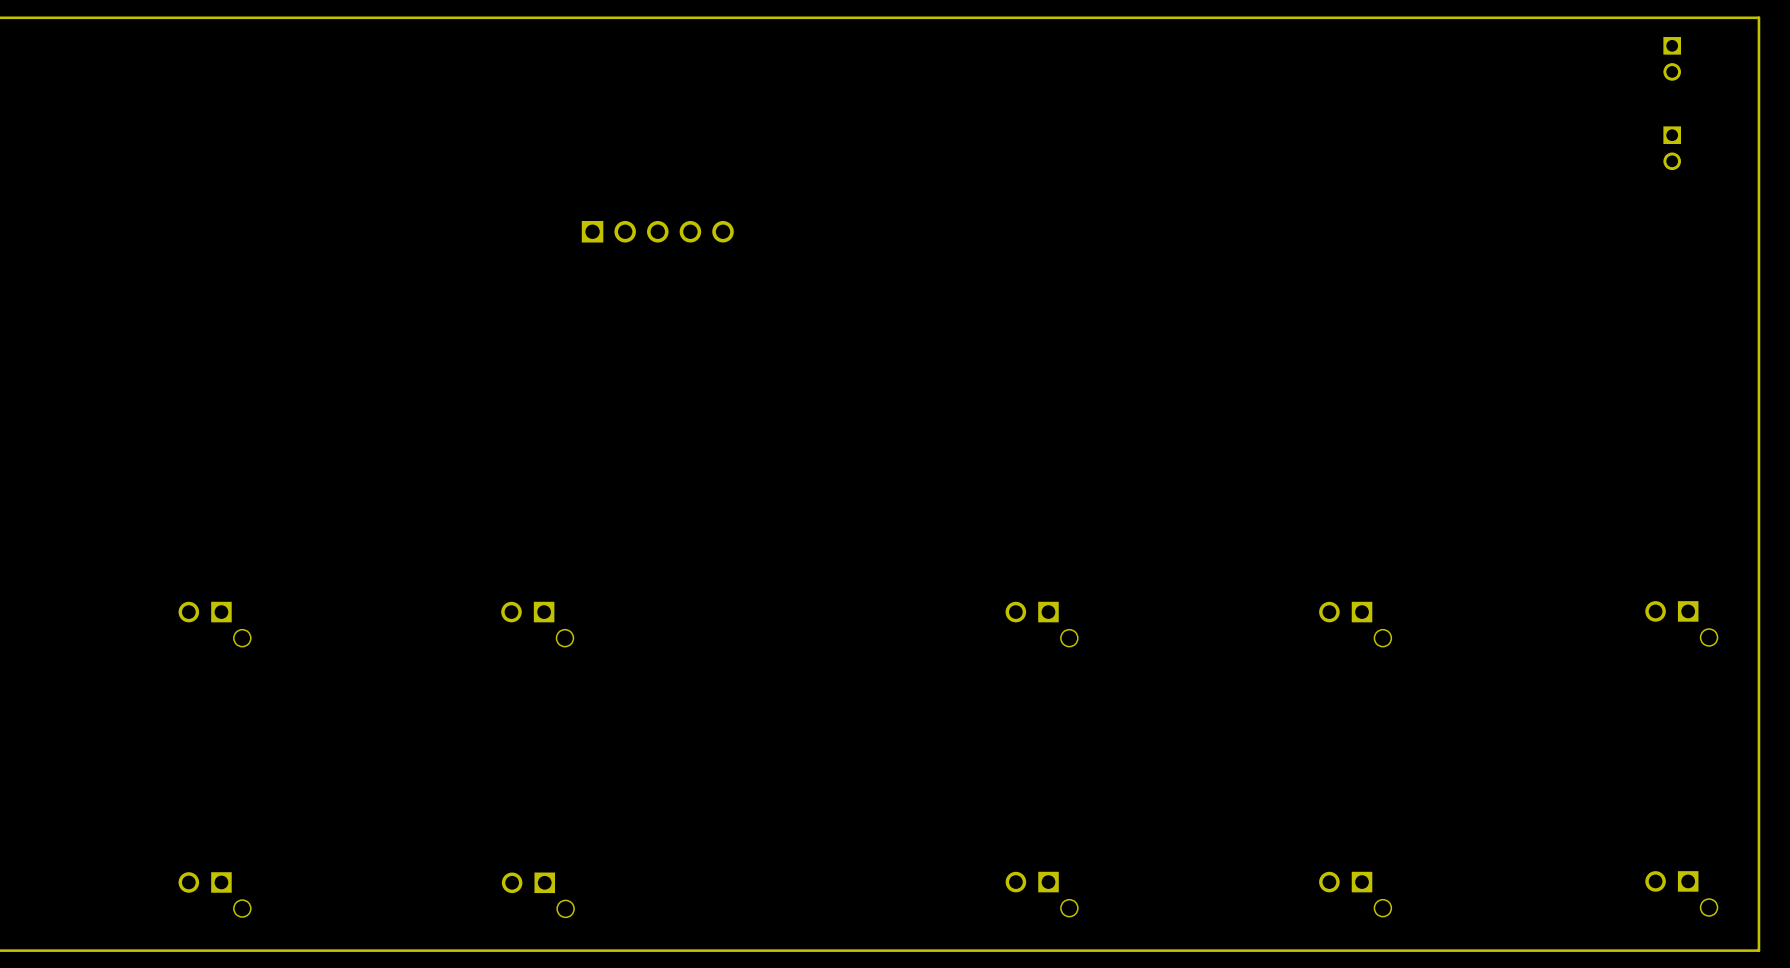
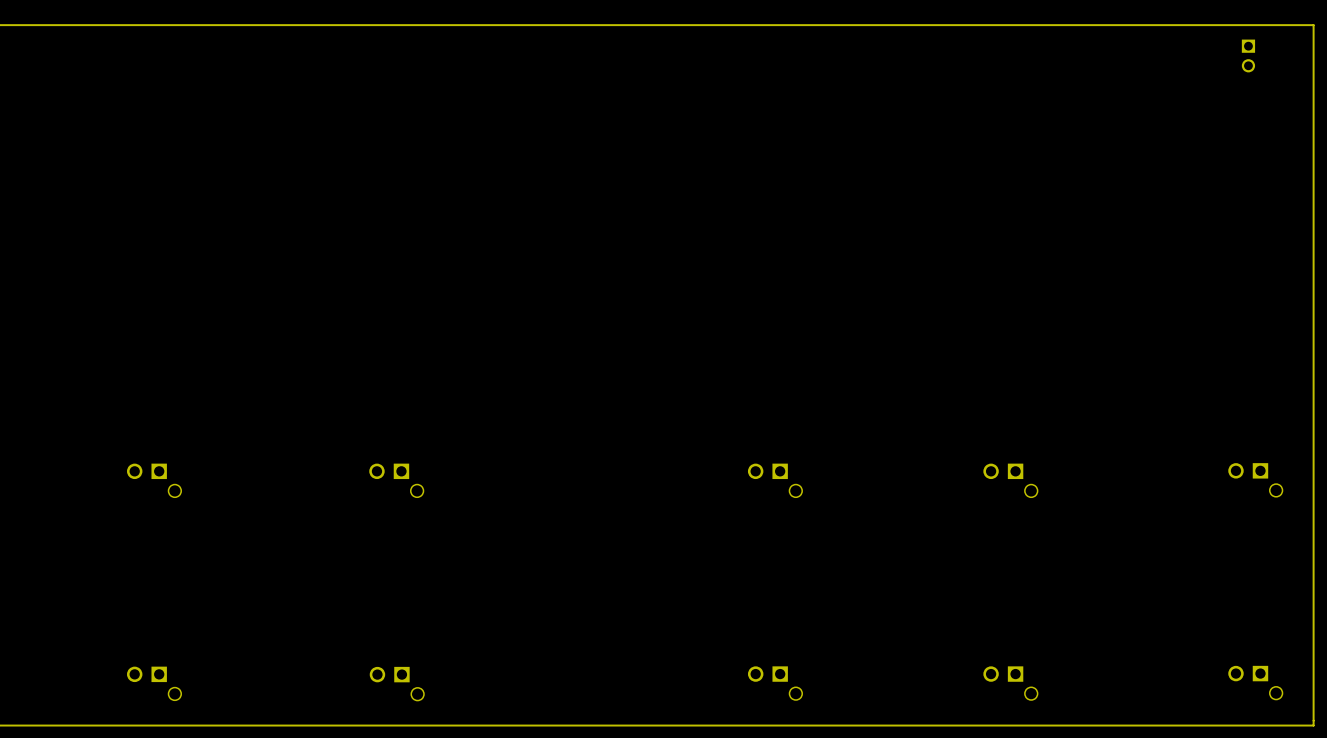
part: (1672, 148) -> none
part: (657, 231) -> none

